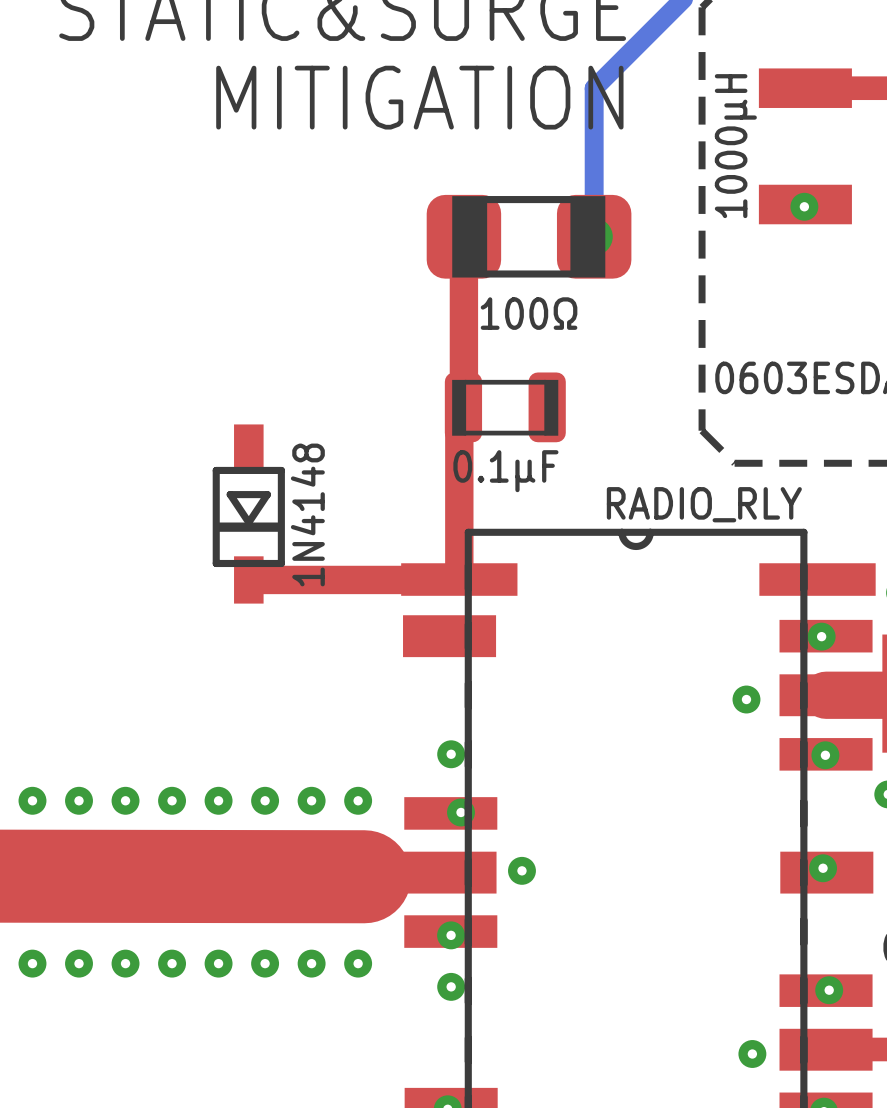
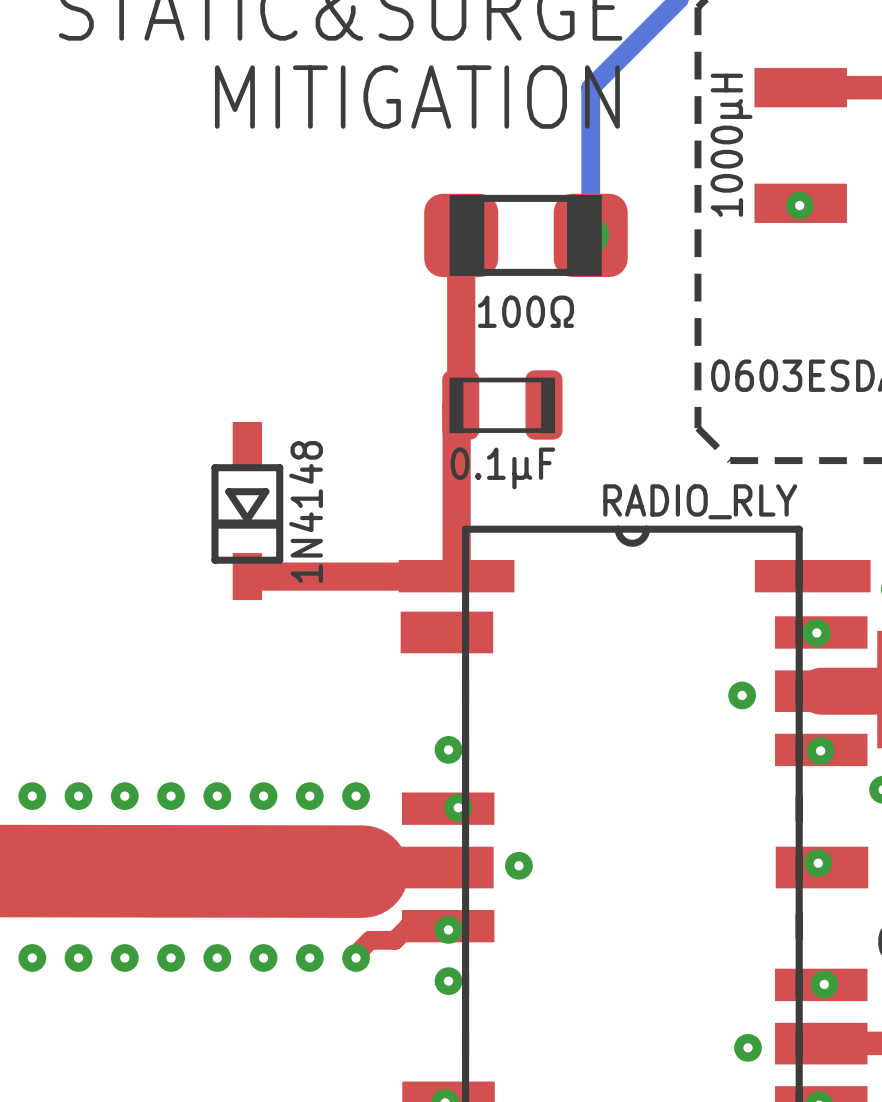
top track: none -> (448, 926) (409, 926) (394, 940) (370, 940) (360, 949)

